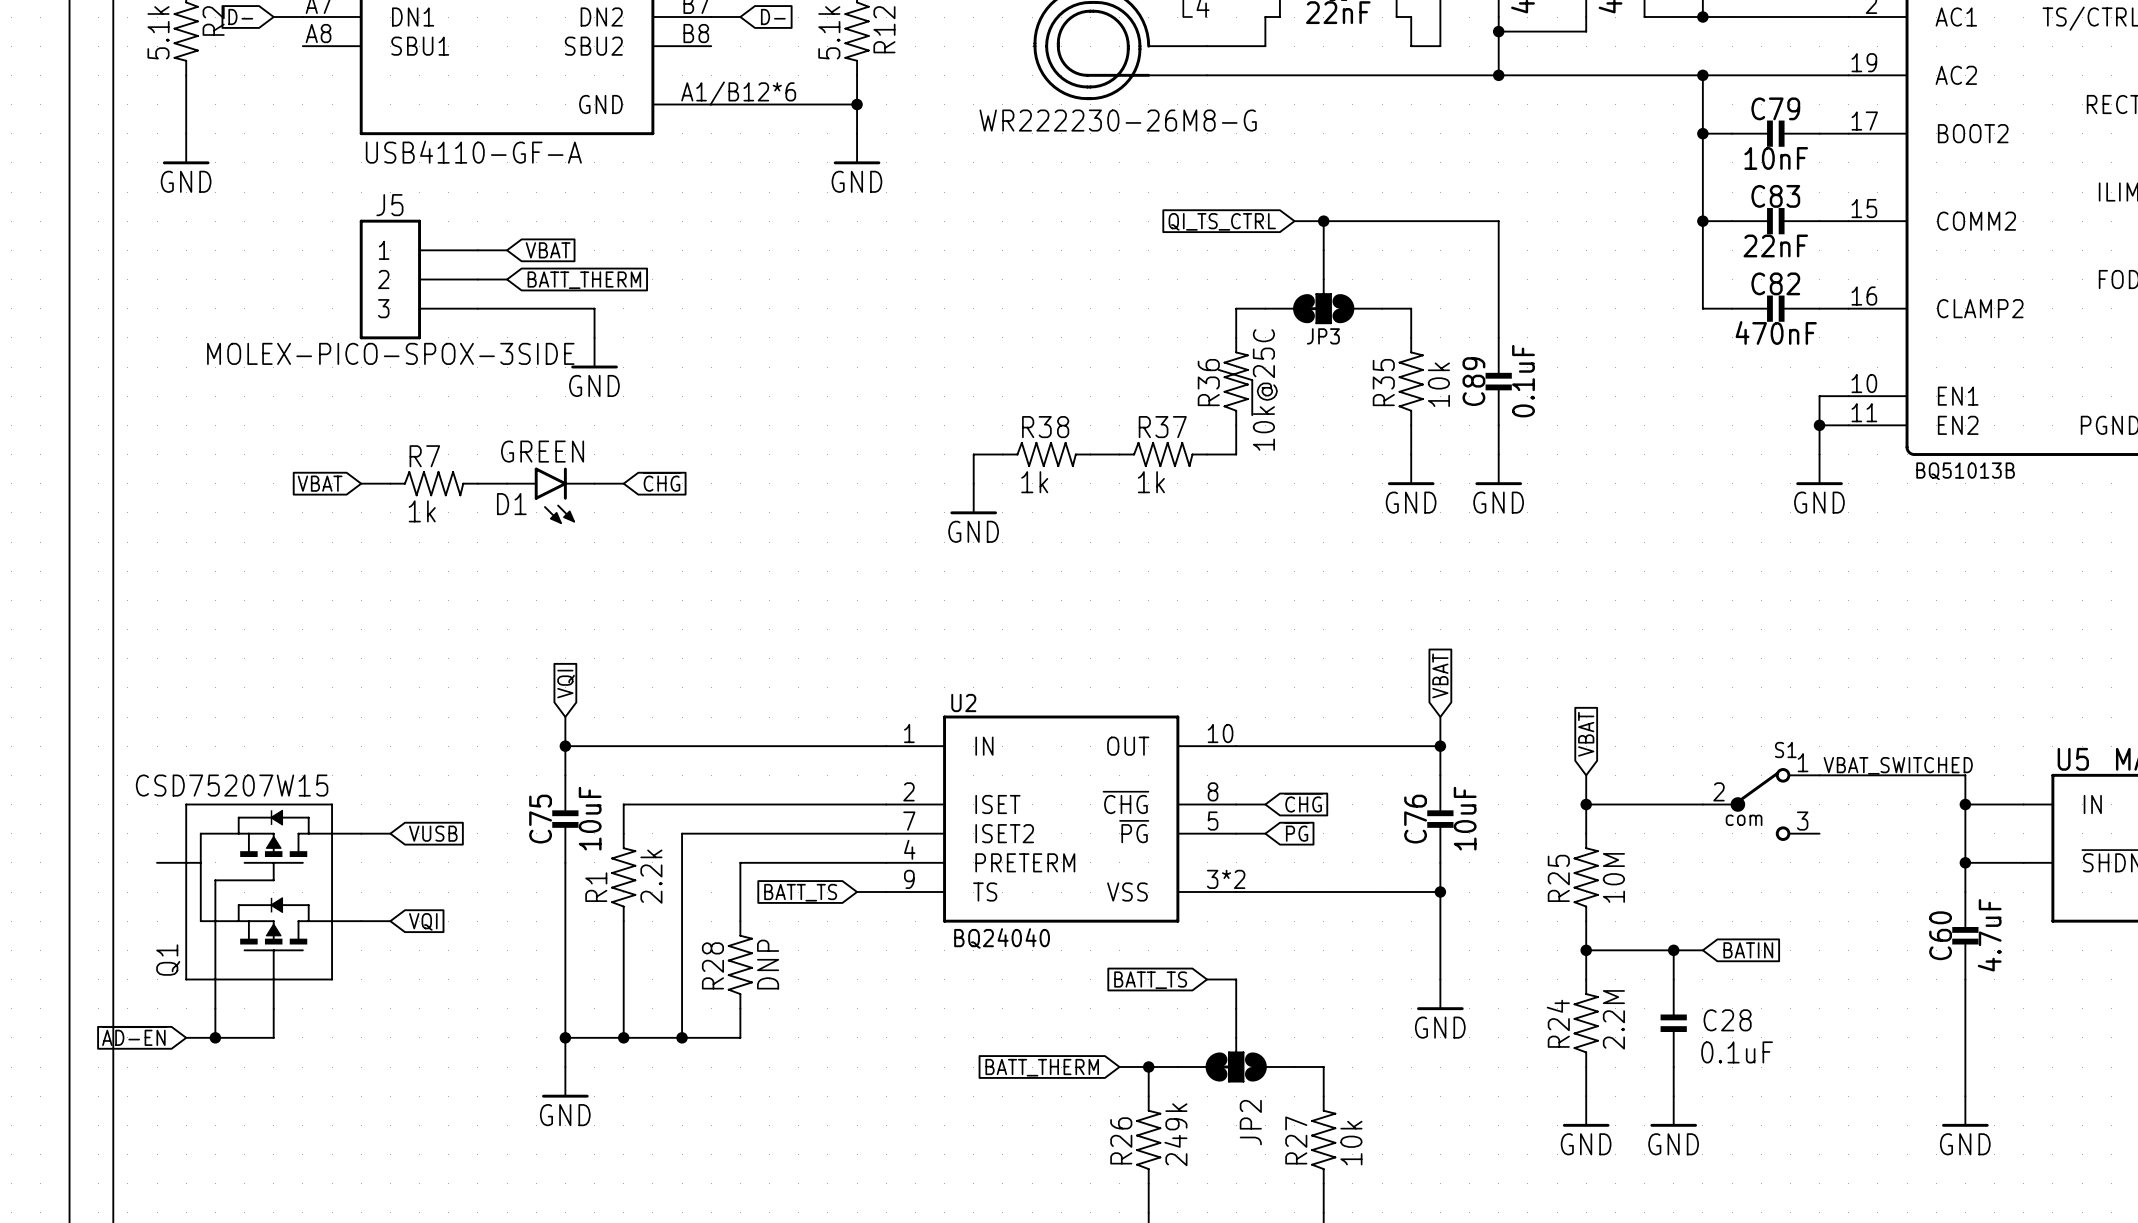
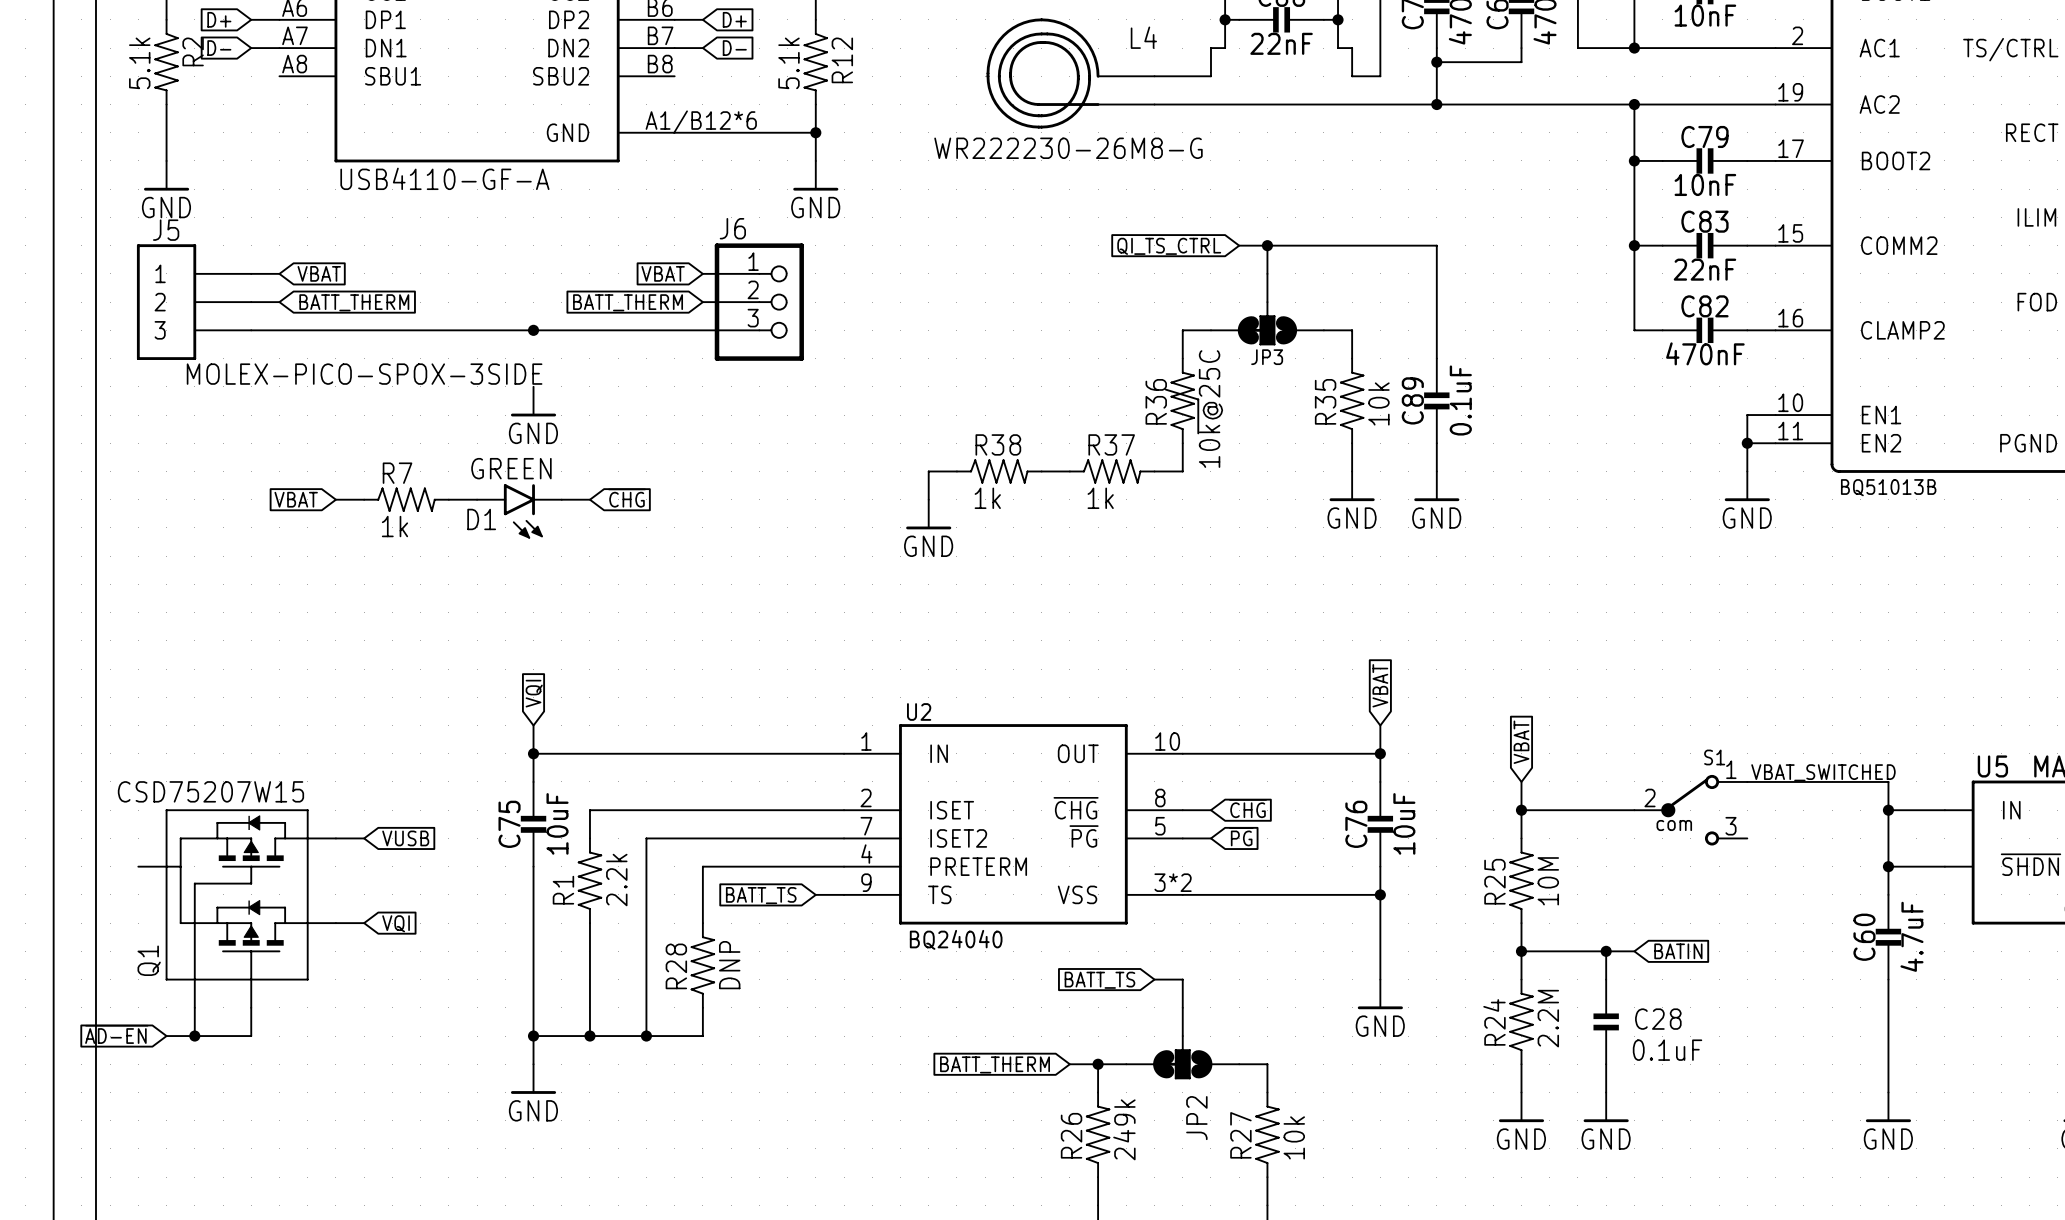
global label: none -> VBAT (319, 273)
wire: (477, 250) (507, 250) -> (251, 273) (279, 273)
global label: VBAT (548, 250) -> none
global label: none -> VBAT (663, 273)
wire: none -> (702, 273) (759, 273)
J5 position: (418, 279) -> (194, 302)
wire: (477, 279) (507, 279) -> (251, 302) (279, 302)
wire: none -> (702, 302) (759, 302)
J6: none -> (759, 302)
global label: none -> BATT_THERM (354, 302)
global label rotation: 0° (584, 280) -> 180° (628, 302)
wire: none -> (251, 330) (448, 330)
junction: none -> (533, 330)
wire: (594, 308) (594, 337) -> (561, 330) (759, 330)
power symbol position: GND (594, 353) -> GND (533, 401)

